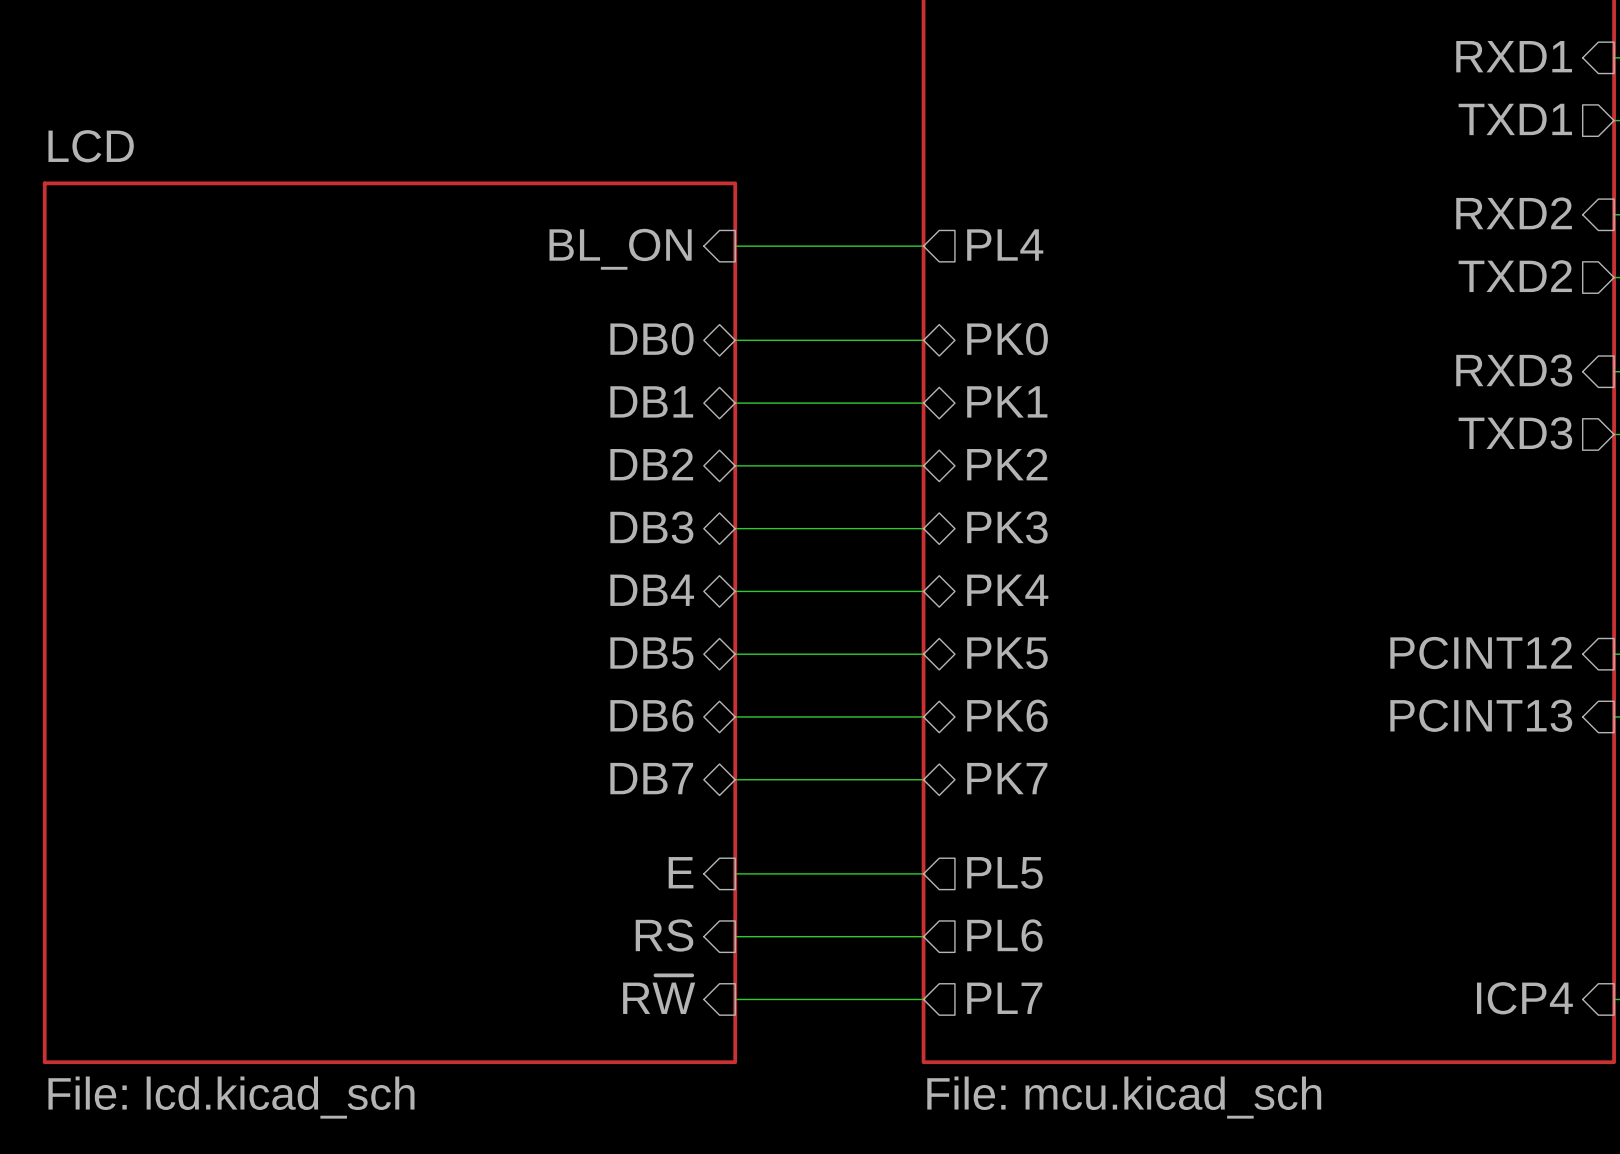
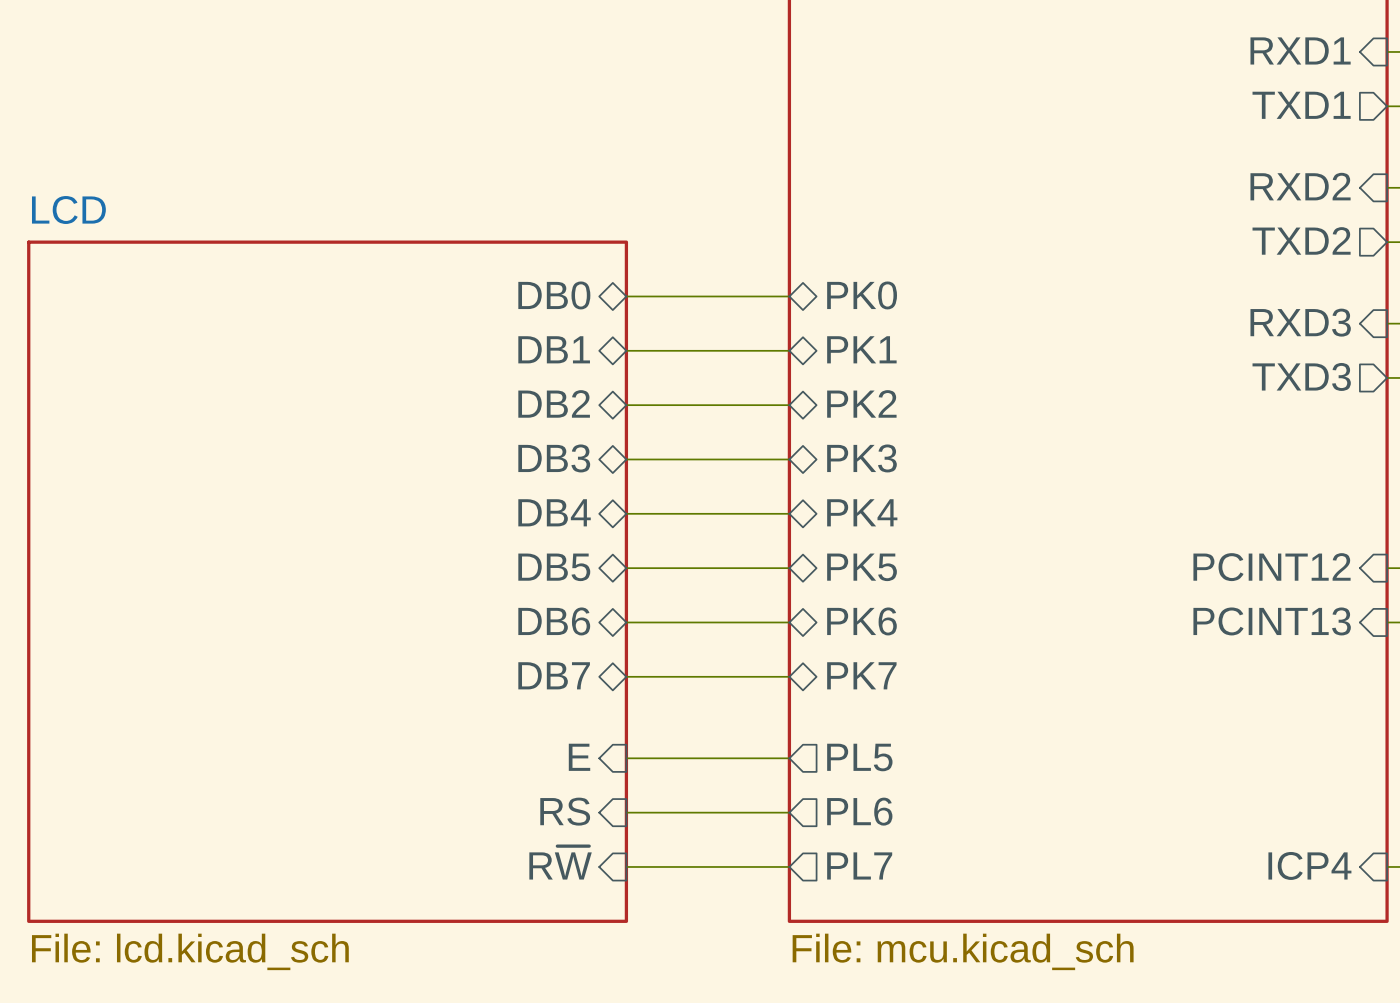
sheet pin: PL4 (1005, 244) -> none
wire: (735, 246) (923, 246) -> none
sheet pin: BL_ON (620, 249) -> none
sheet LCD: File: lcd.kicad_sch (389, 622) -> none
sheet LCD: none -> File: lcd.kicad_sch (327, 581)

